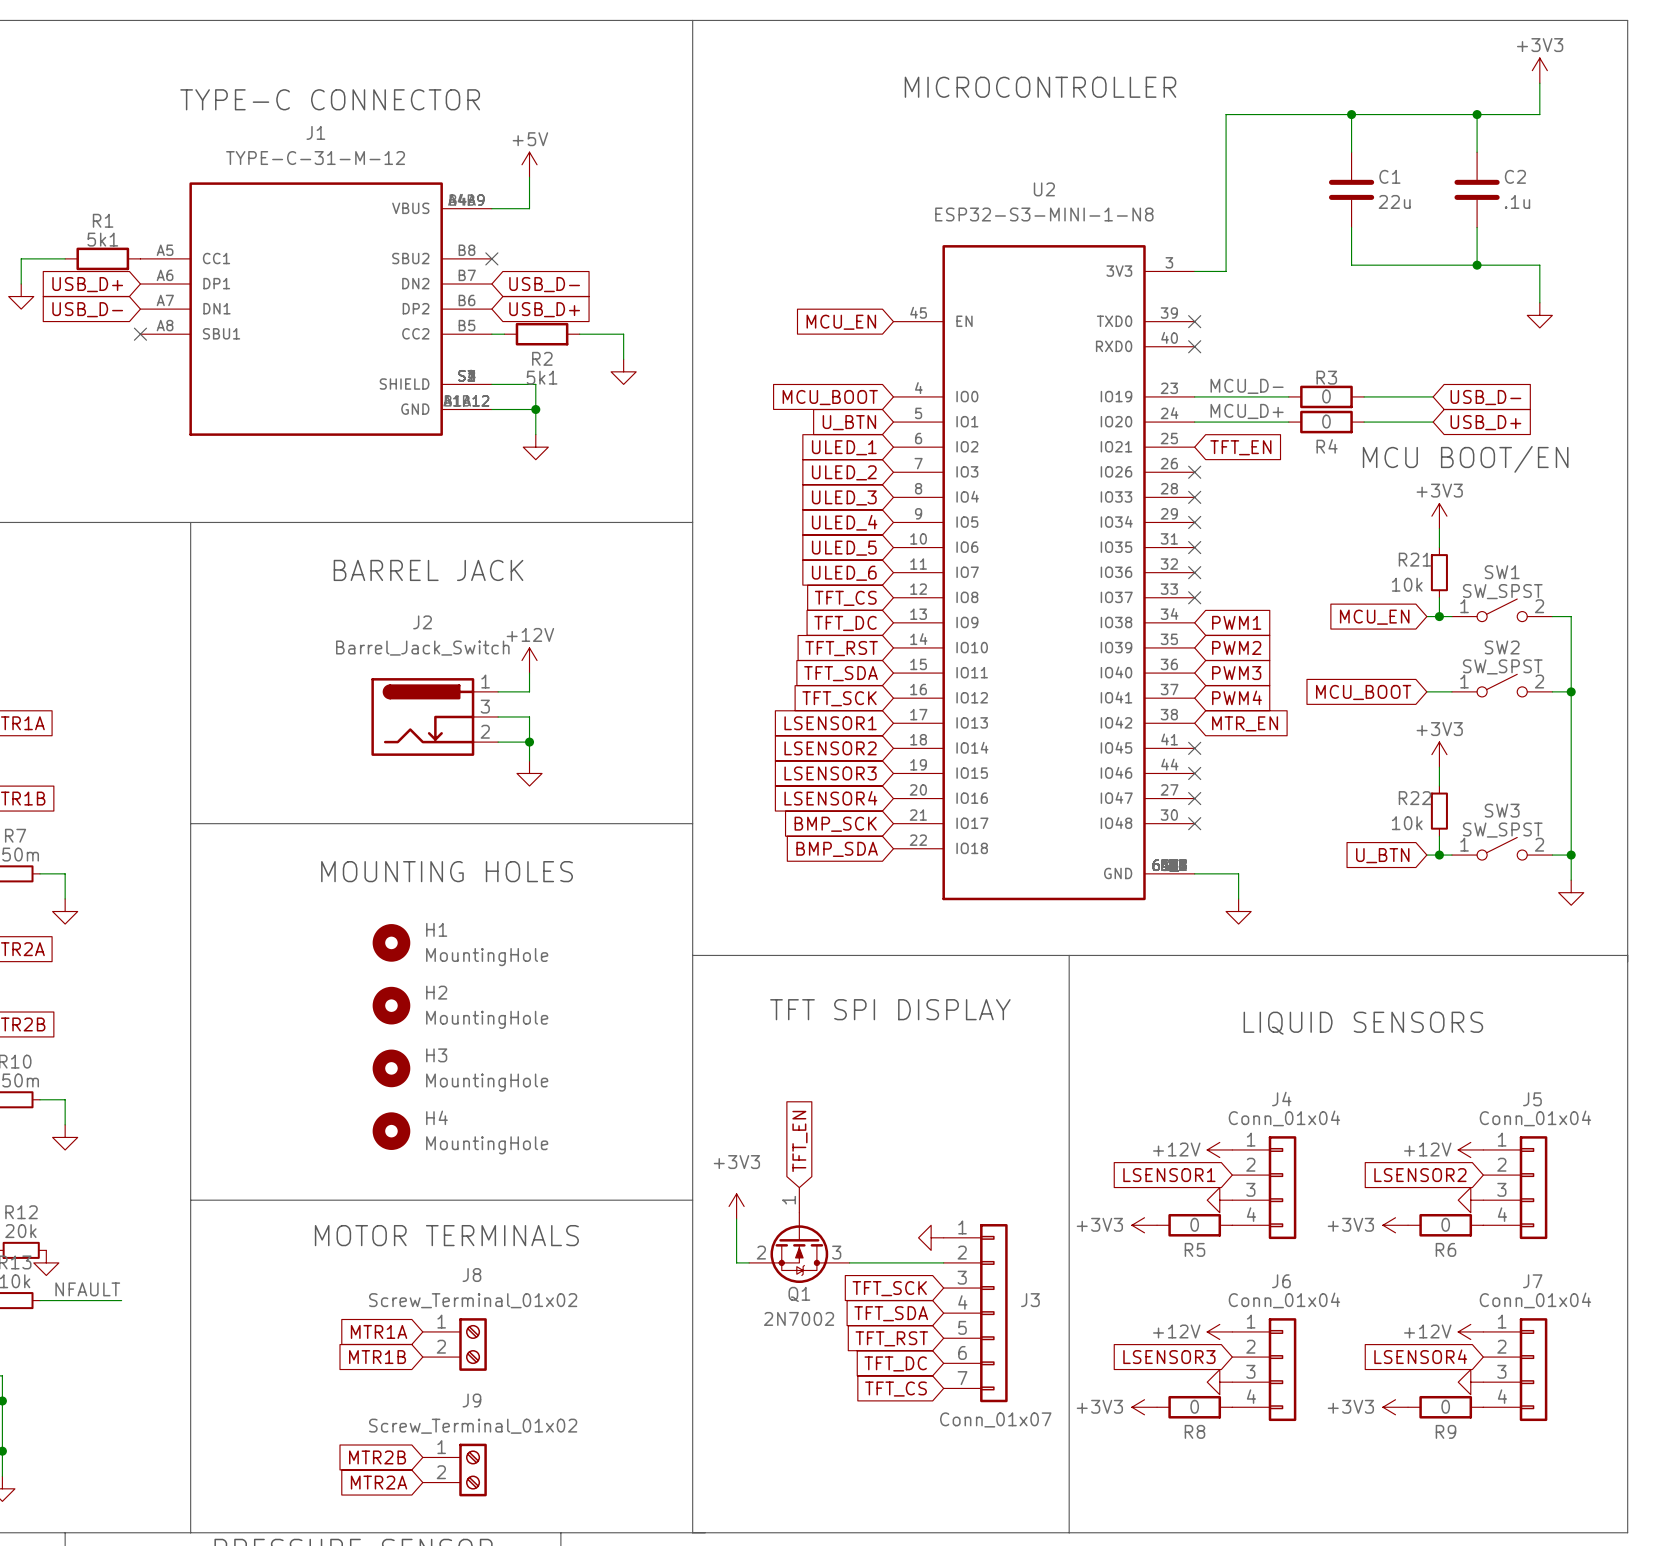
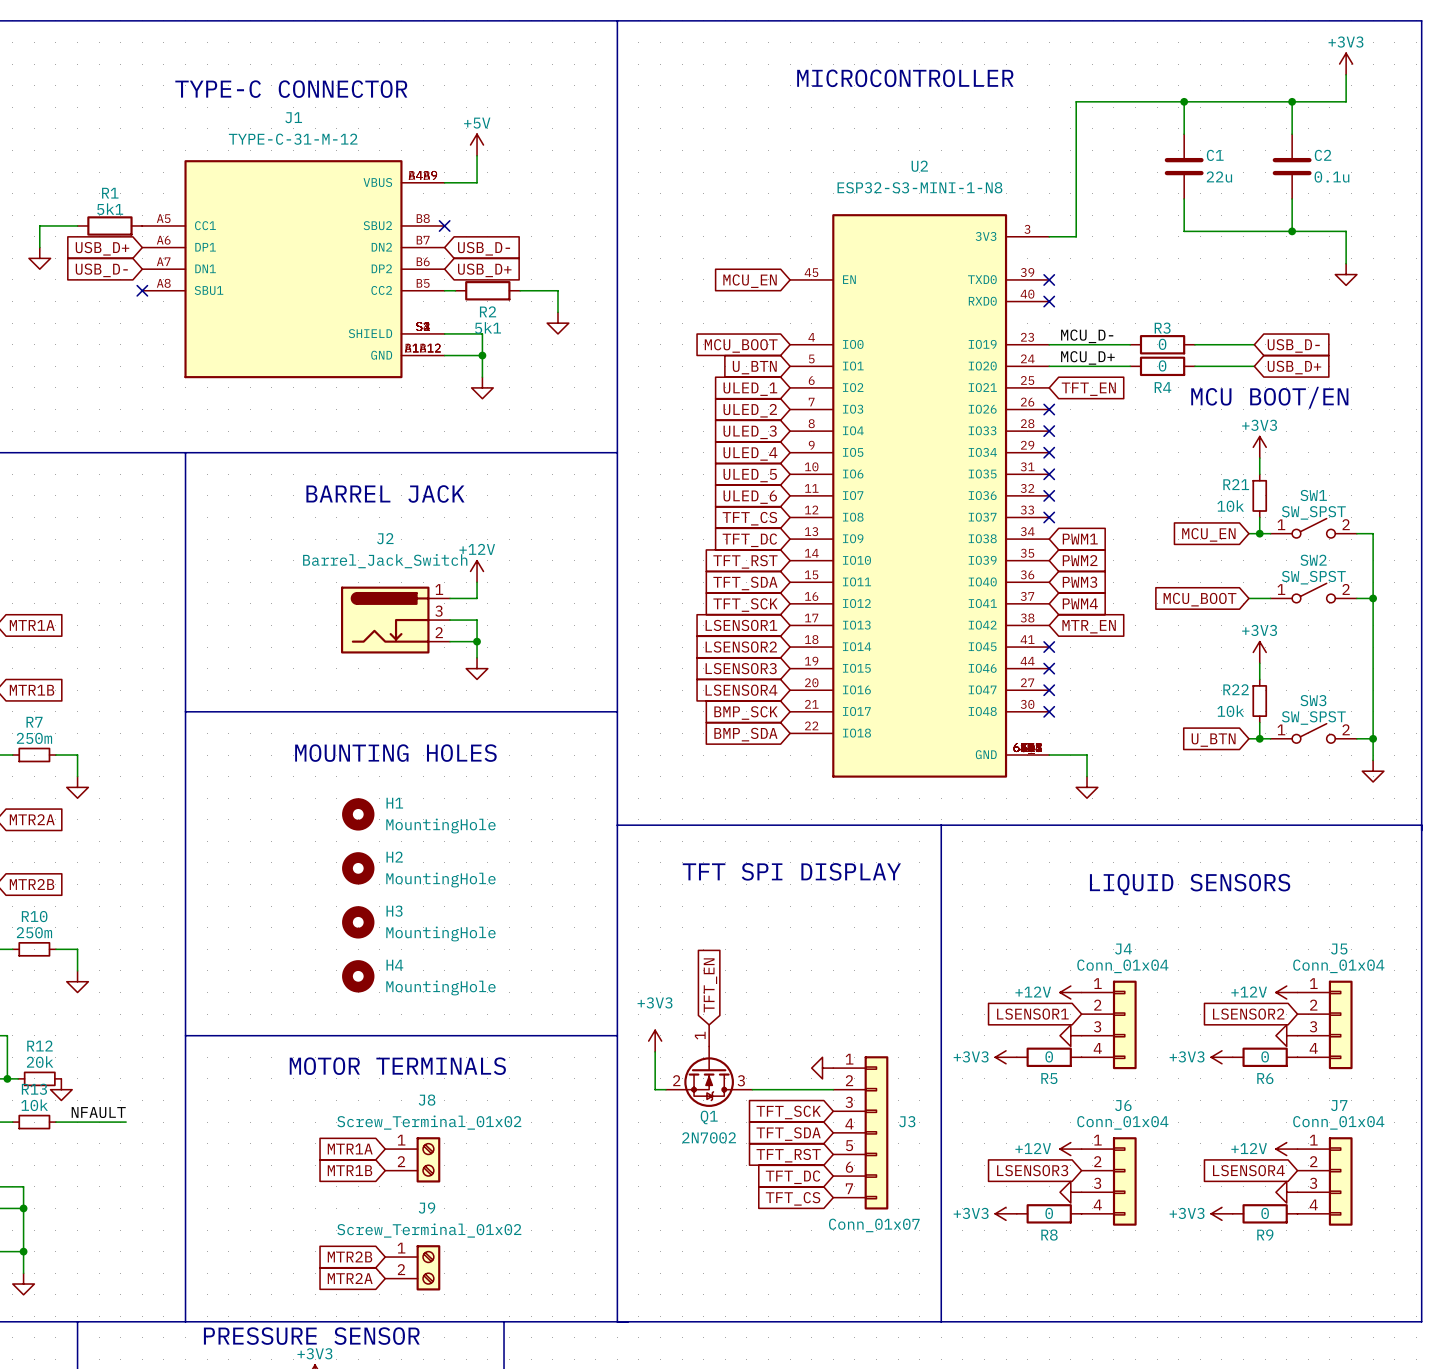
C2 value: .1u (1517, 201) -> 0.1u (1331, 177)

